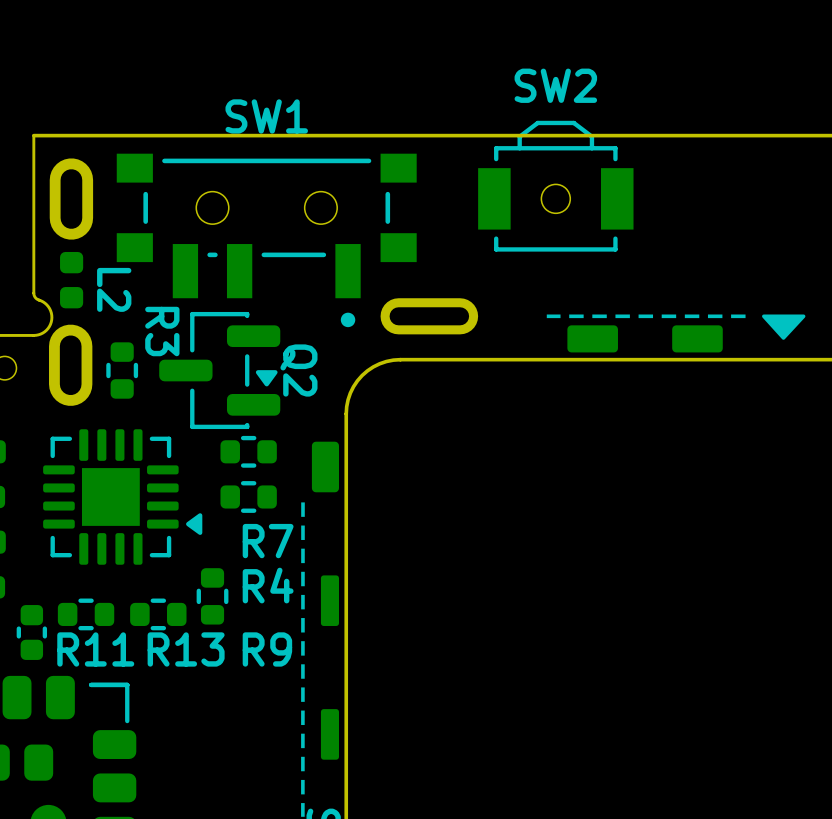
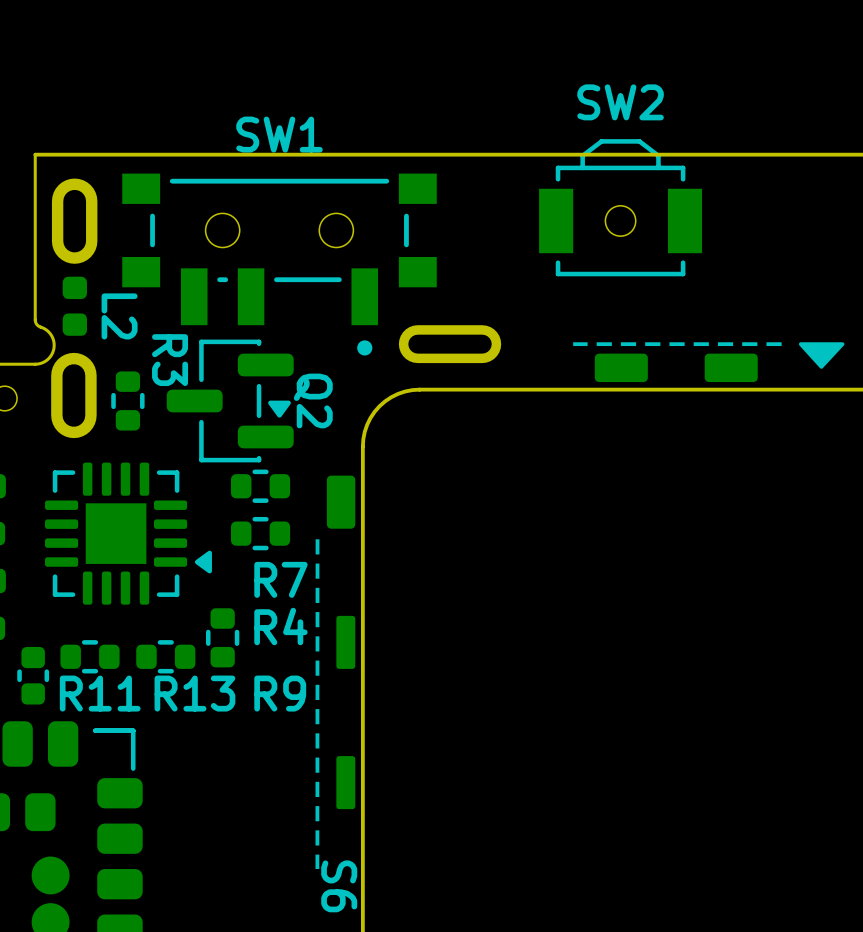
SW2 position: (555, 186) -> (620, 207)

